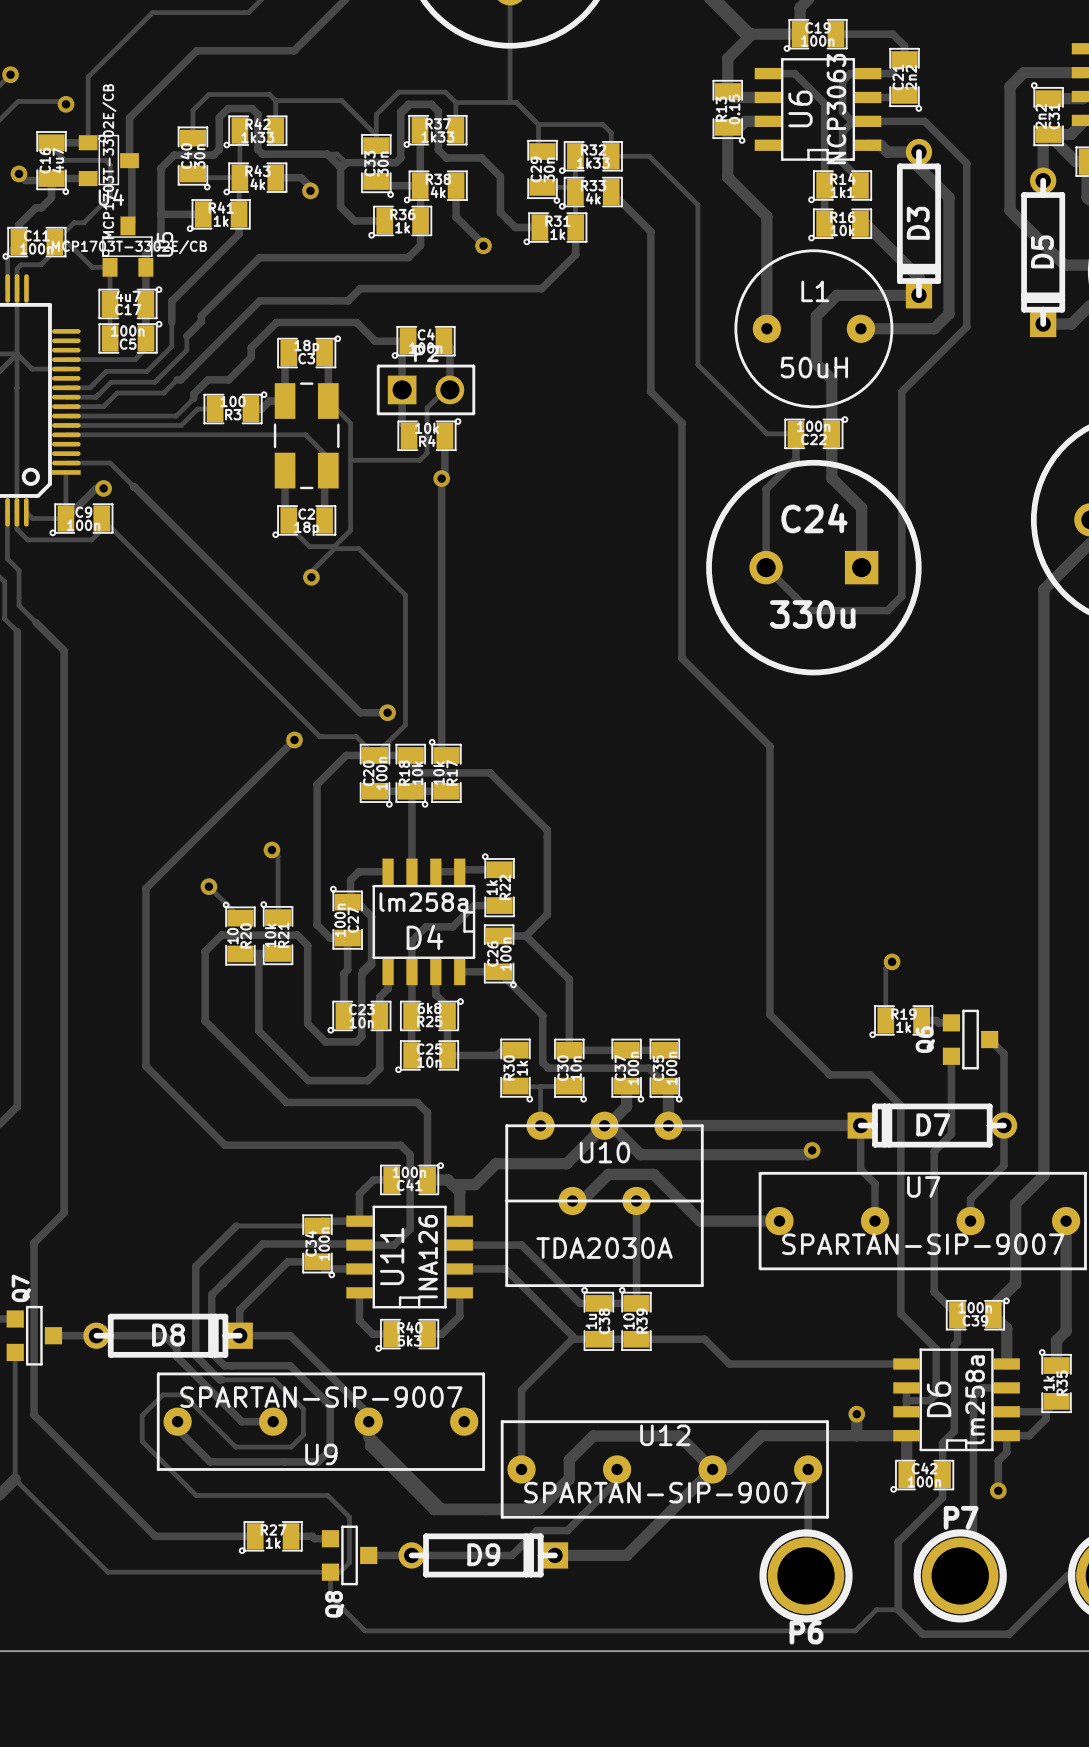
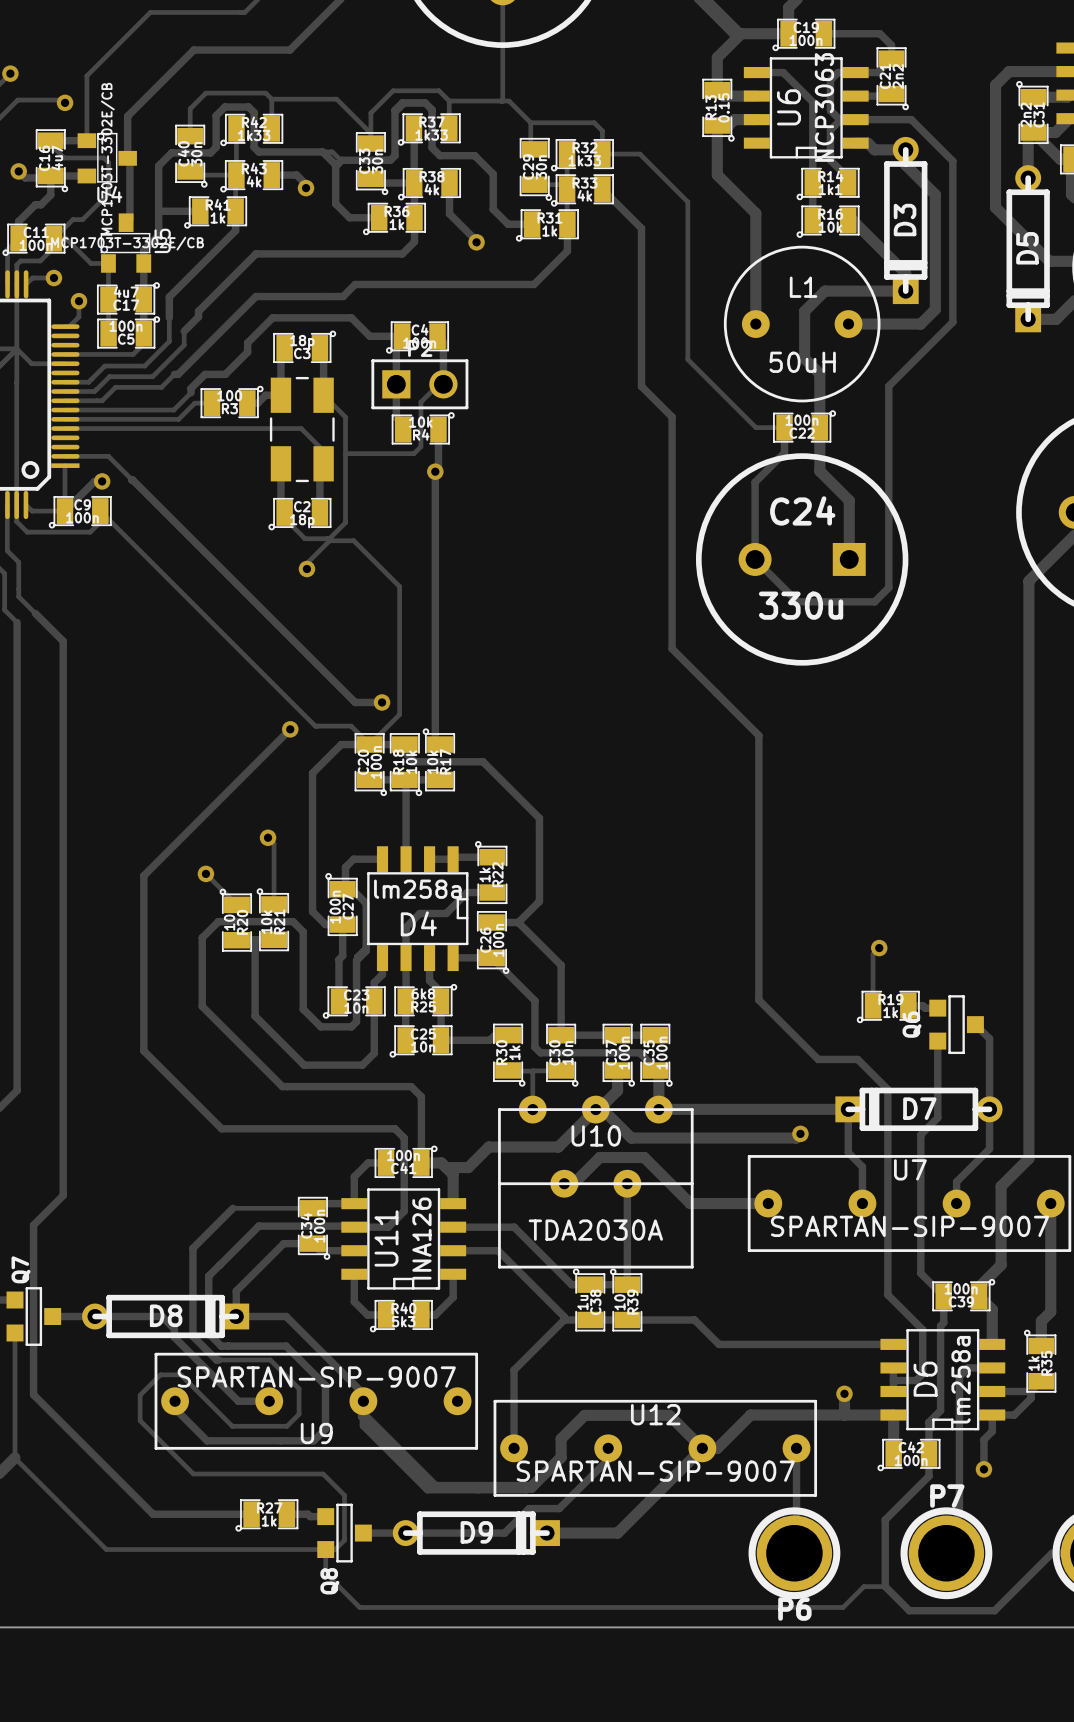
track: none -> (53, 278) (32, 278) (26, 284)
via: none -> (53, 278)
track: none -> (78, 301) (78, 316) (69, 326) (65, 326)
via: none -> (78, 301)

